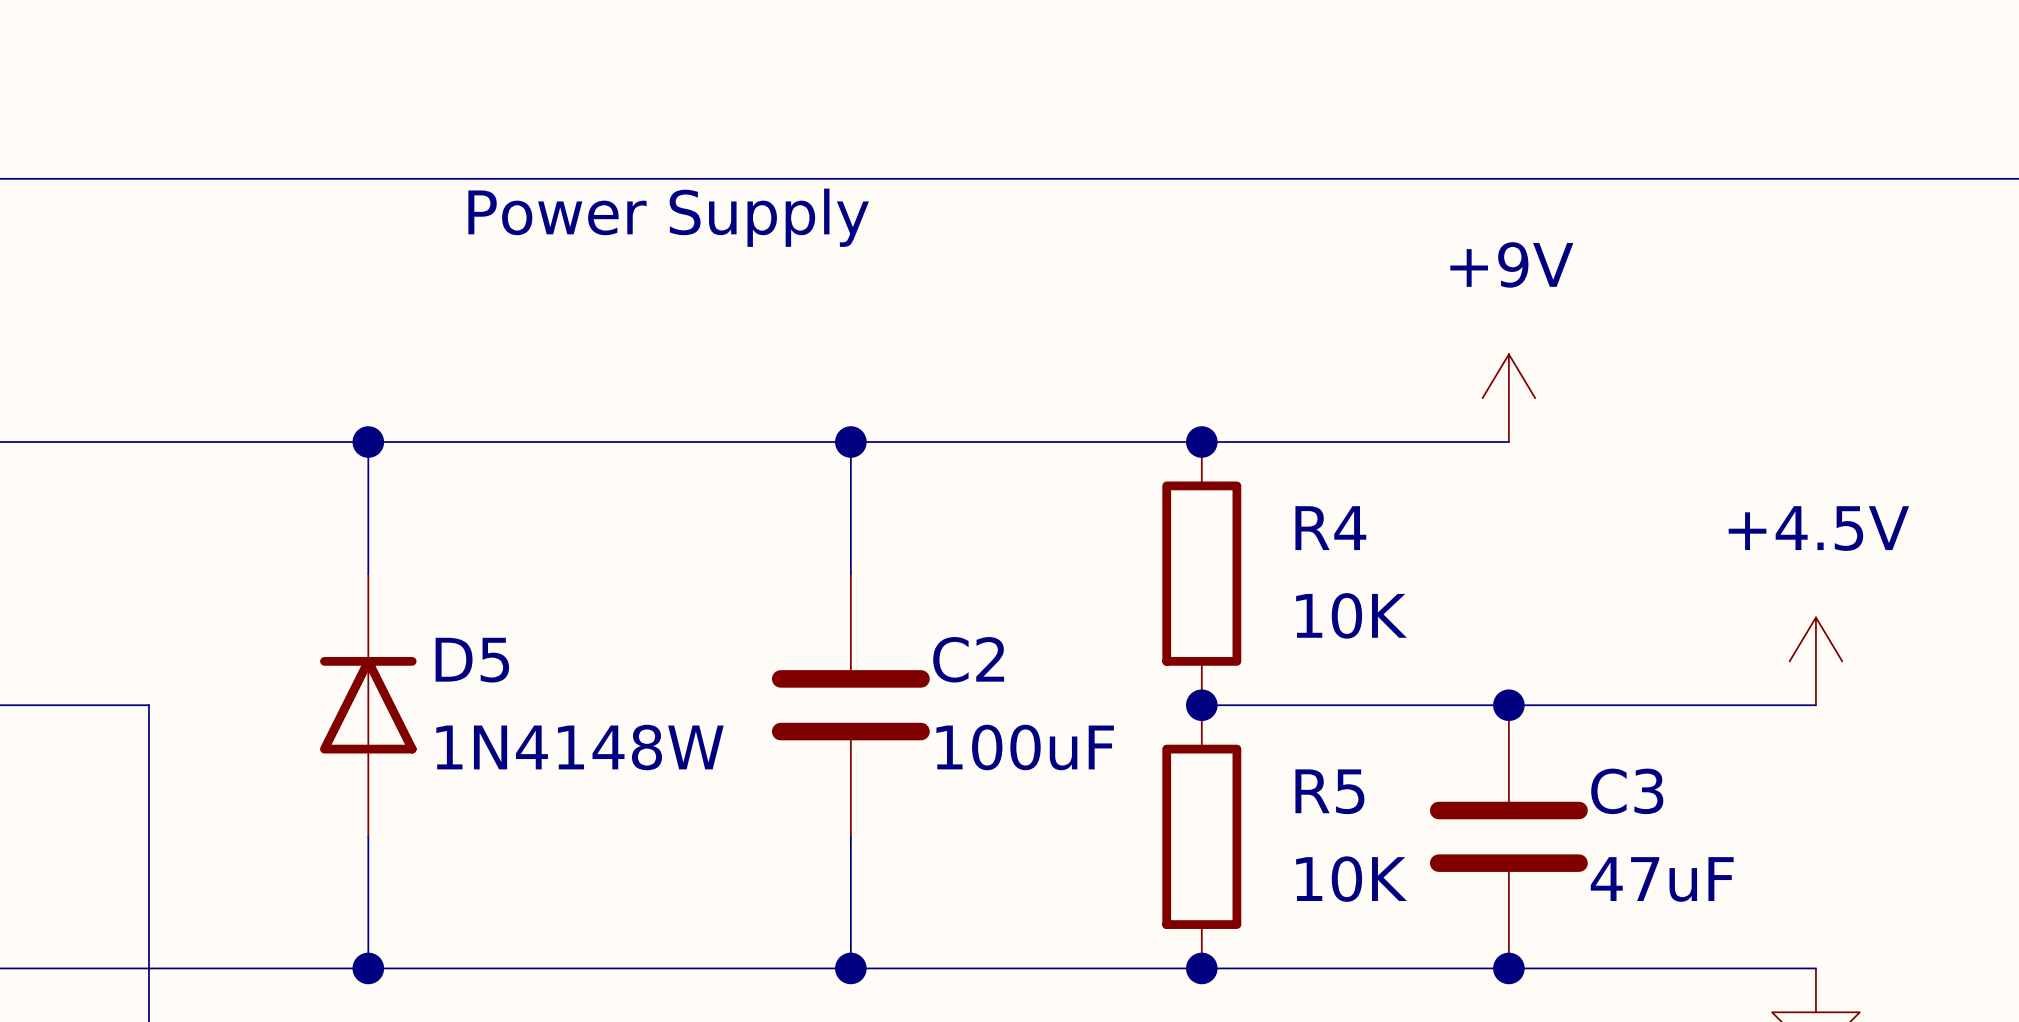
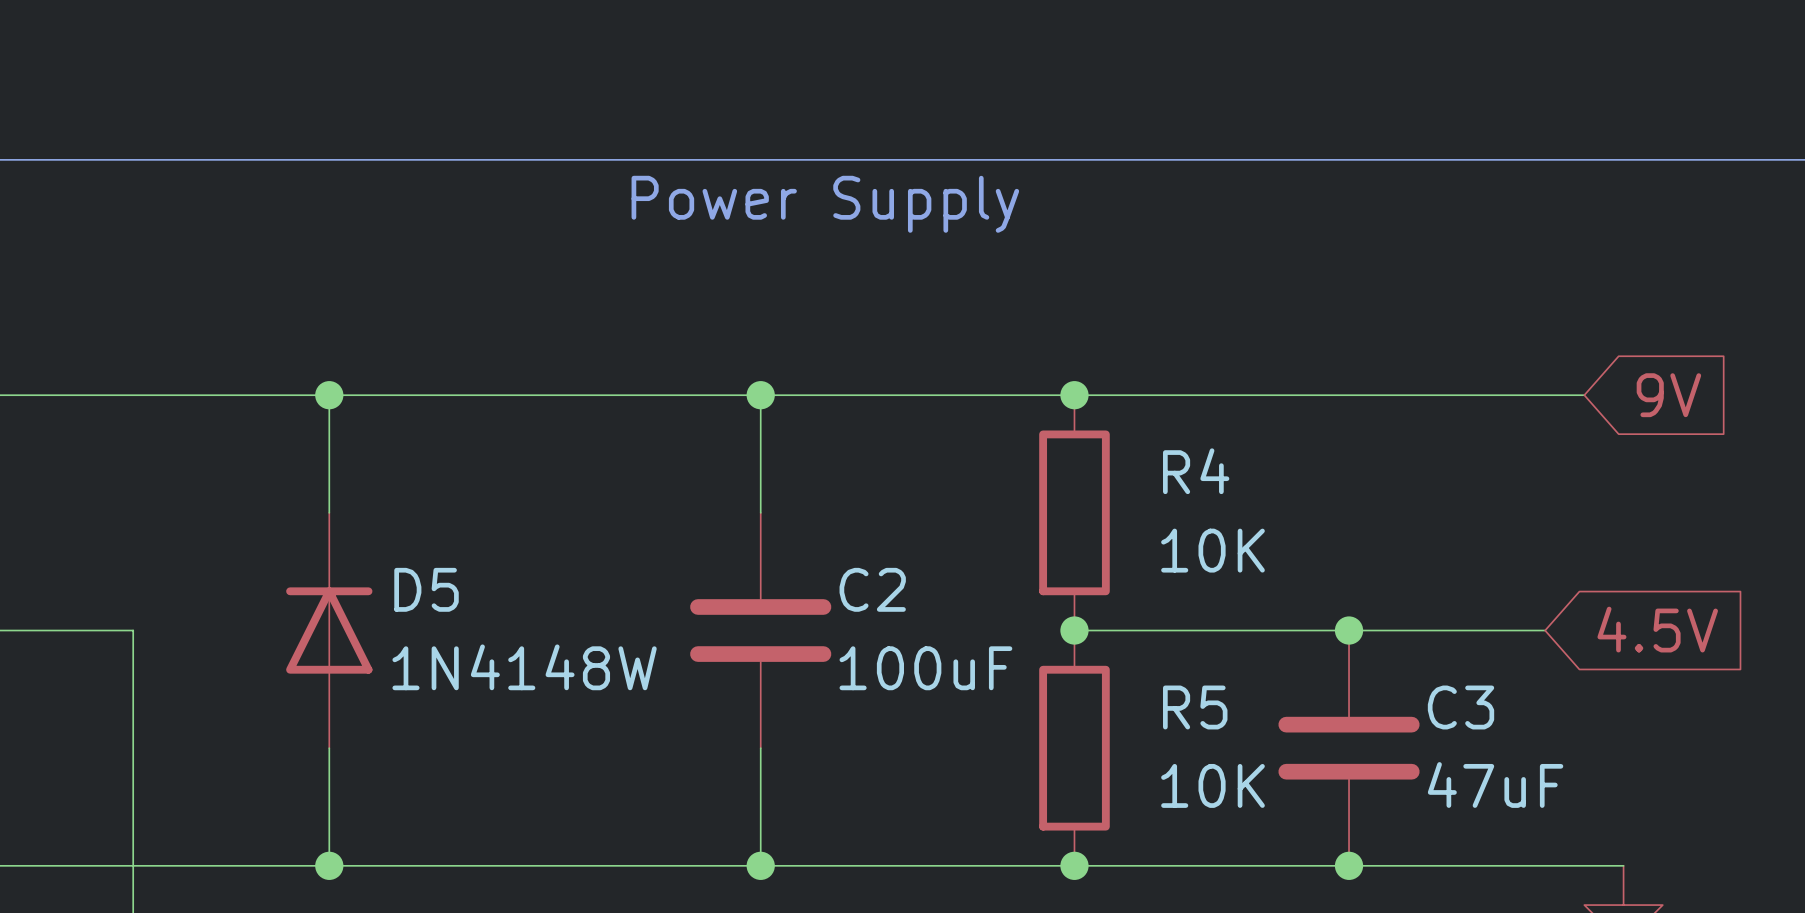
text position: Power Supply (668, 217) -> Power Supply (825, 204)
power symbol: +9V (1508, 398) -> none
wire: none -> (1349, 395) (1584, 395)
global label: none -> 9V (1668, 395)
power symbol: +4.5V (1815, 661) -> none
wire: (1728, 705) (1815, 705) -> none
global label: none -> 4.5V (1657, 629)

